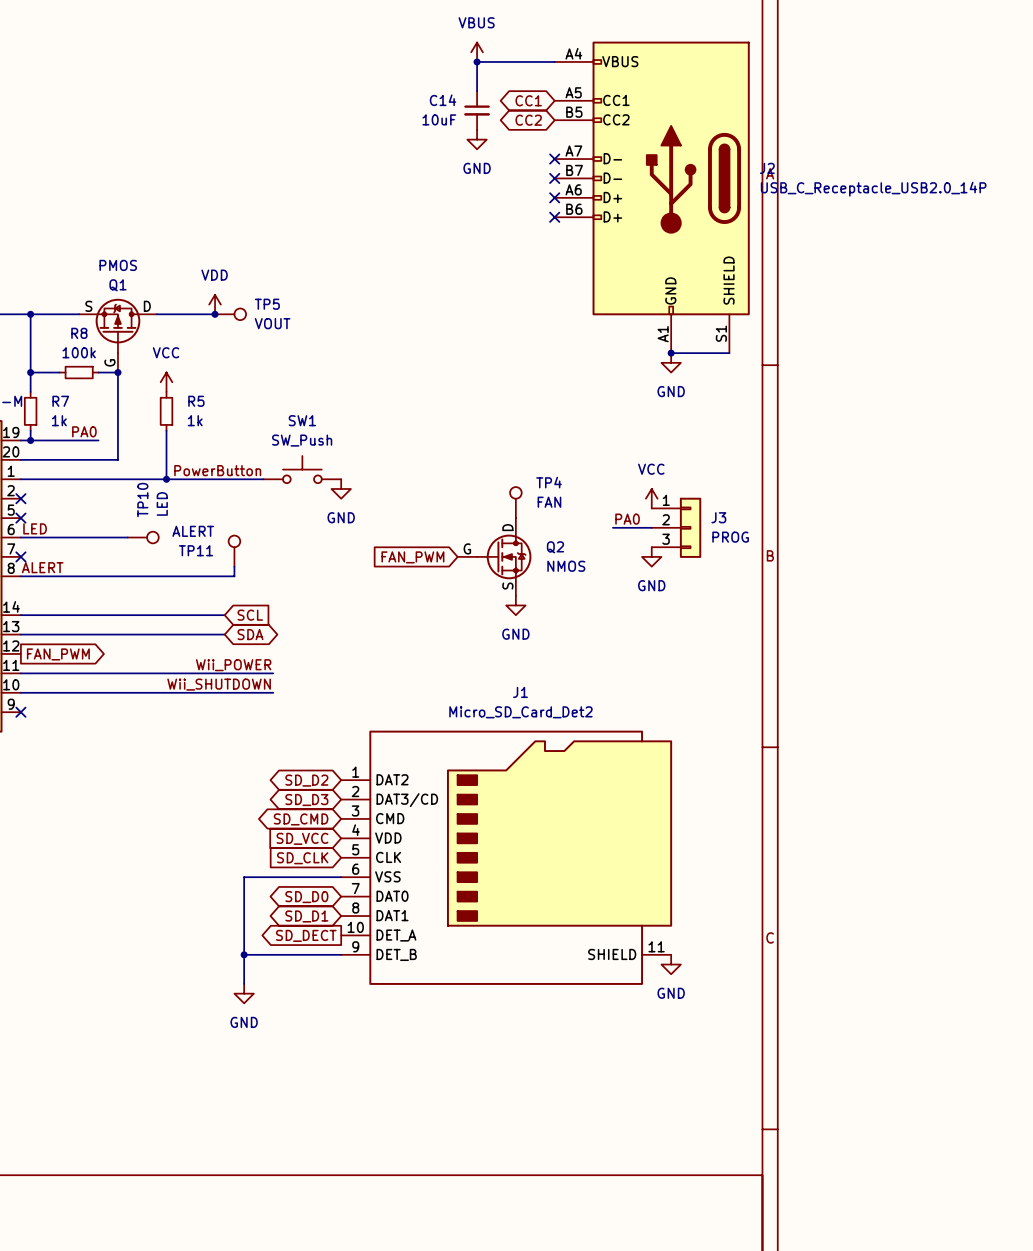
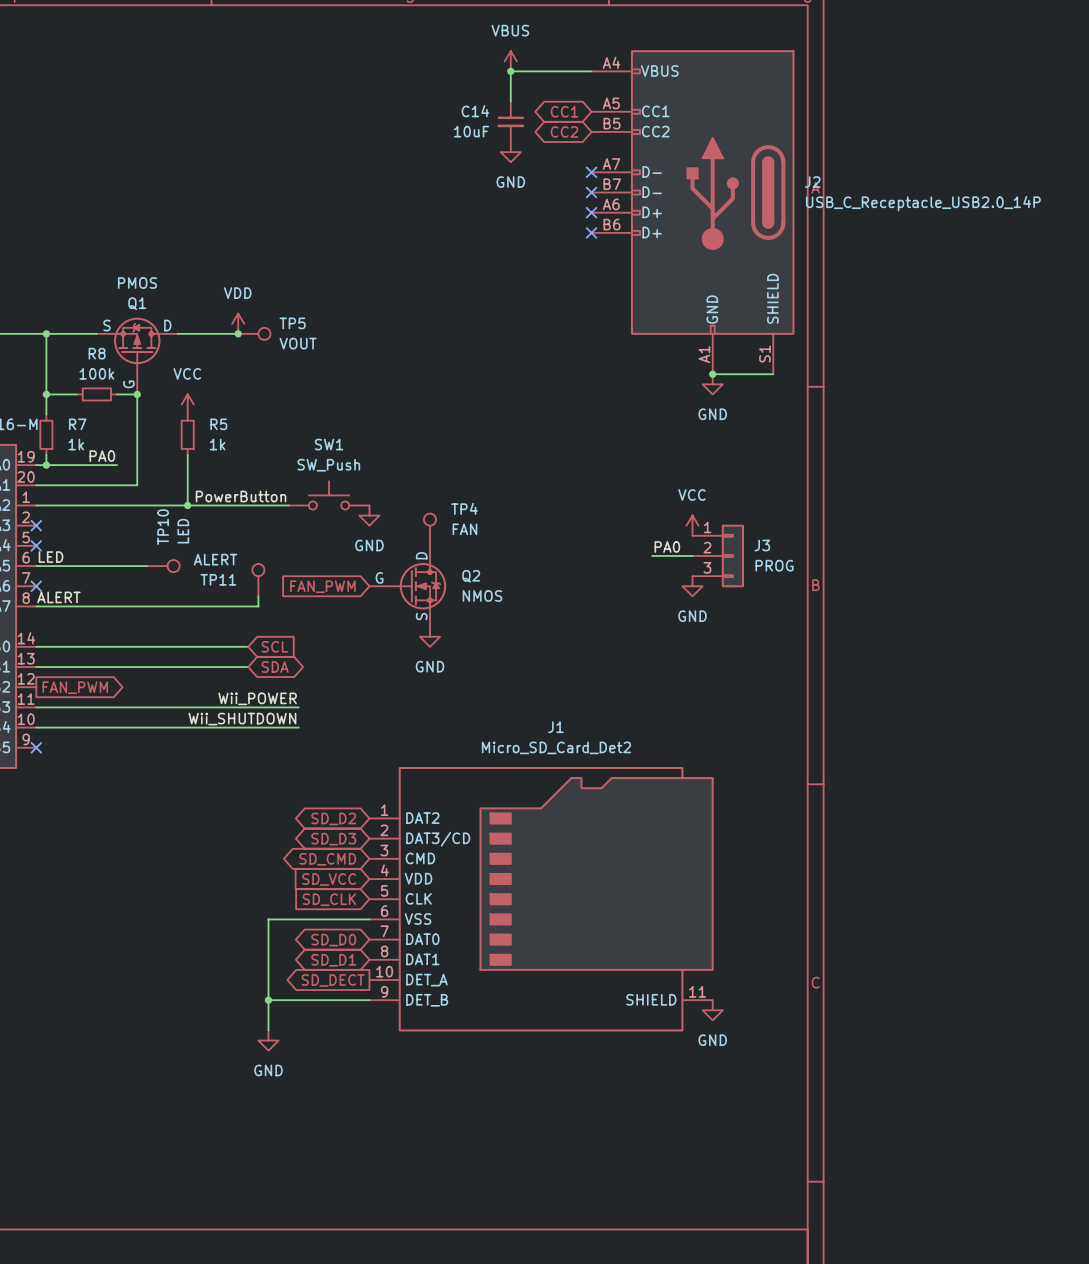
TP4 position: (515, 502) -> (430, 529)
Q2 position: (494, 556) -> (407, 586)
global label position: FAN_PWM (412, 557) -> FAN_PWM (322, 586)
power symbol position: GND (515, 605) -> GND (430, 636)

